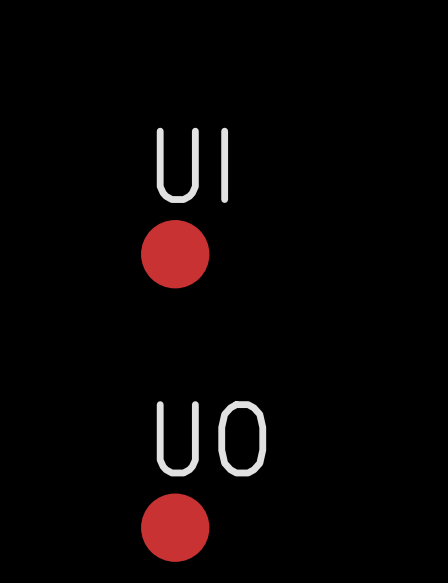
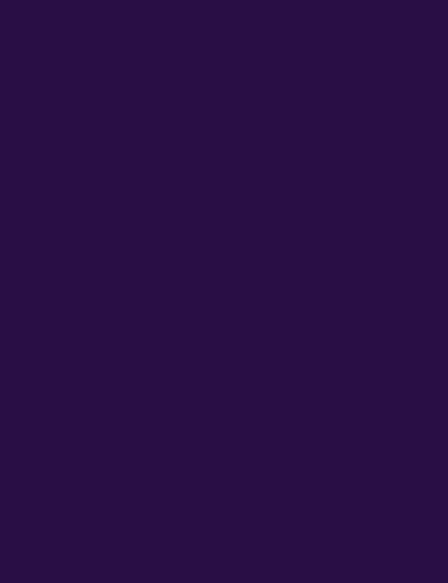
UI: (175, 254) -> none
UO: (175, 527) -> none

